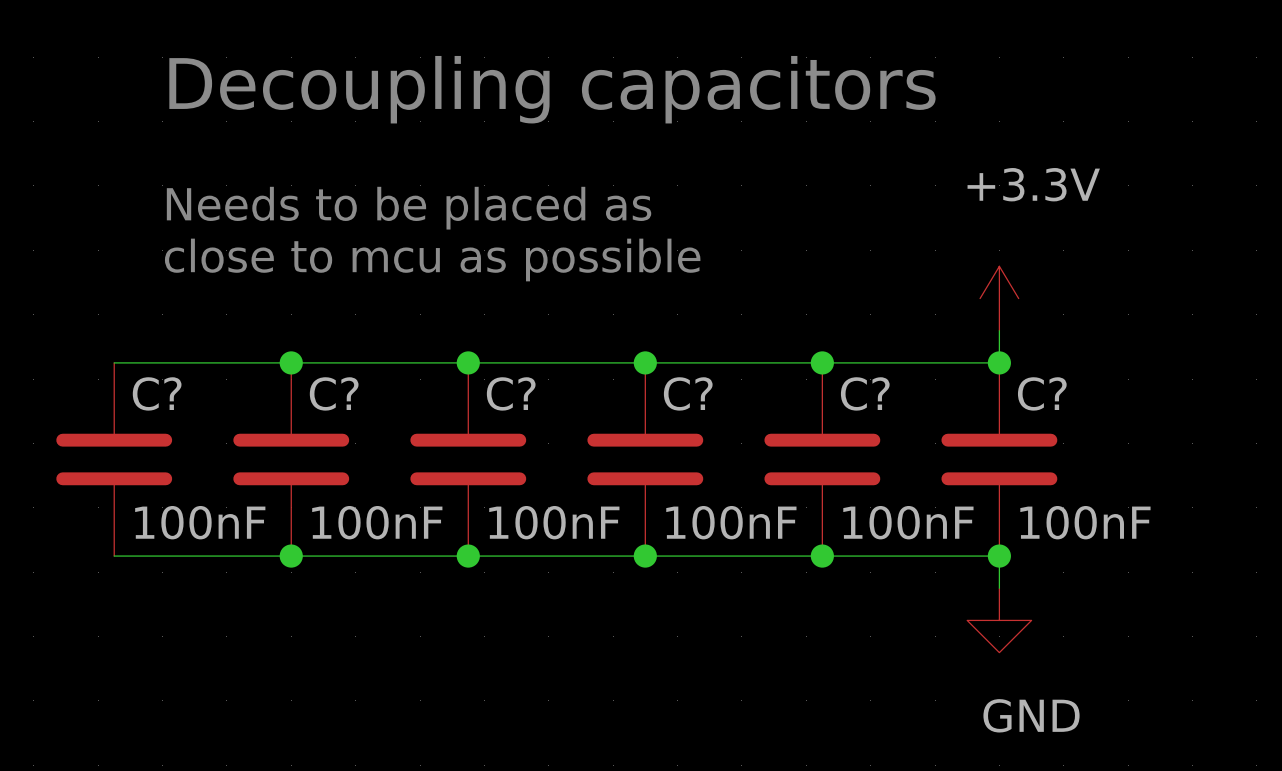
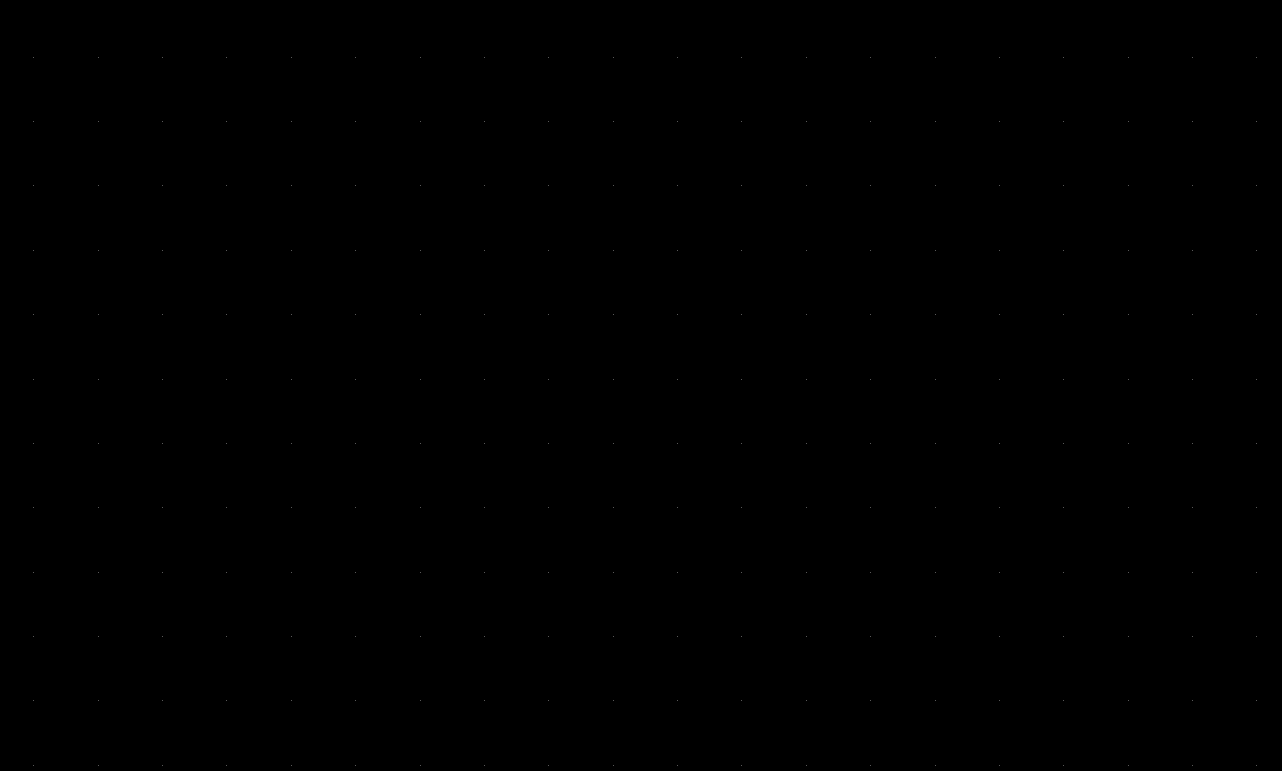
text: Decoupling capacitors (552, 89) -> none
text: Needs to be placed as (409, 208) -> none
text: close to mcu as possible (432, 259) -> none
power symbol: +3.3V (999, 298) -> none
wire: (999, 330) (999, 362) (114, 362) -> none
junction: (291, 362) -> none
junction: (468, 362) -> none
junction: (645, 362) -> none
junction: (822, 362) -> none
junction: (999, 362) -> none
C?: 100nF (114, 459) -> none
C?: 100nF (291, 459) -> none
C?: 100nF (468, 459) -> none
C?: 100nF (645, 459) -> none
C?: 100nF (822, 459) -> none
C?: 100nF (999, 459) -> none
wire: (114, 556) (999, 556) (999, 588) -> none
junction: (291, 556) -> none
junction: (468, 556) -> none
junction: (645, 556) -> none
junction: (822, 556) -> none
junction: (999, 556) -> none
power symbol: GND (999, 620) -> none

